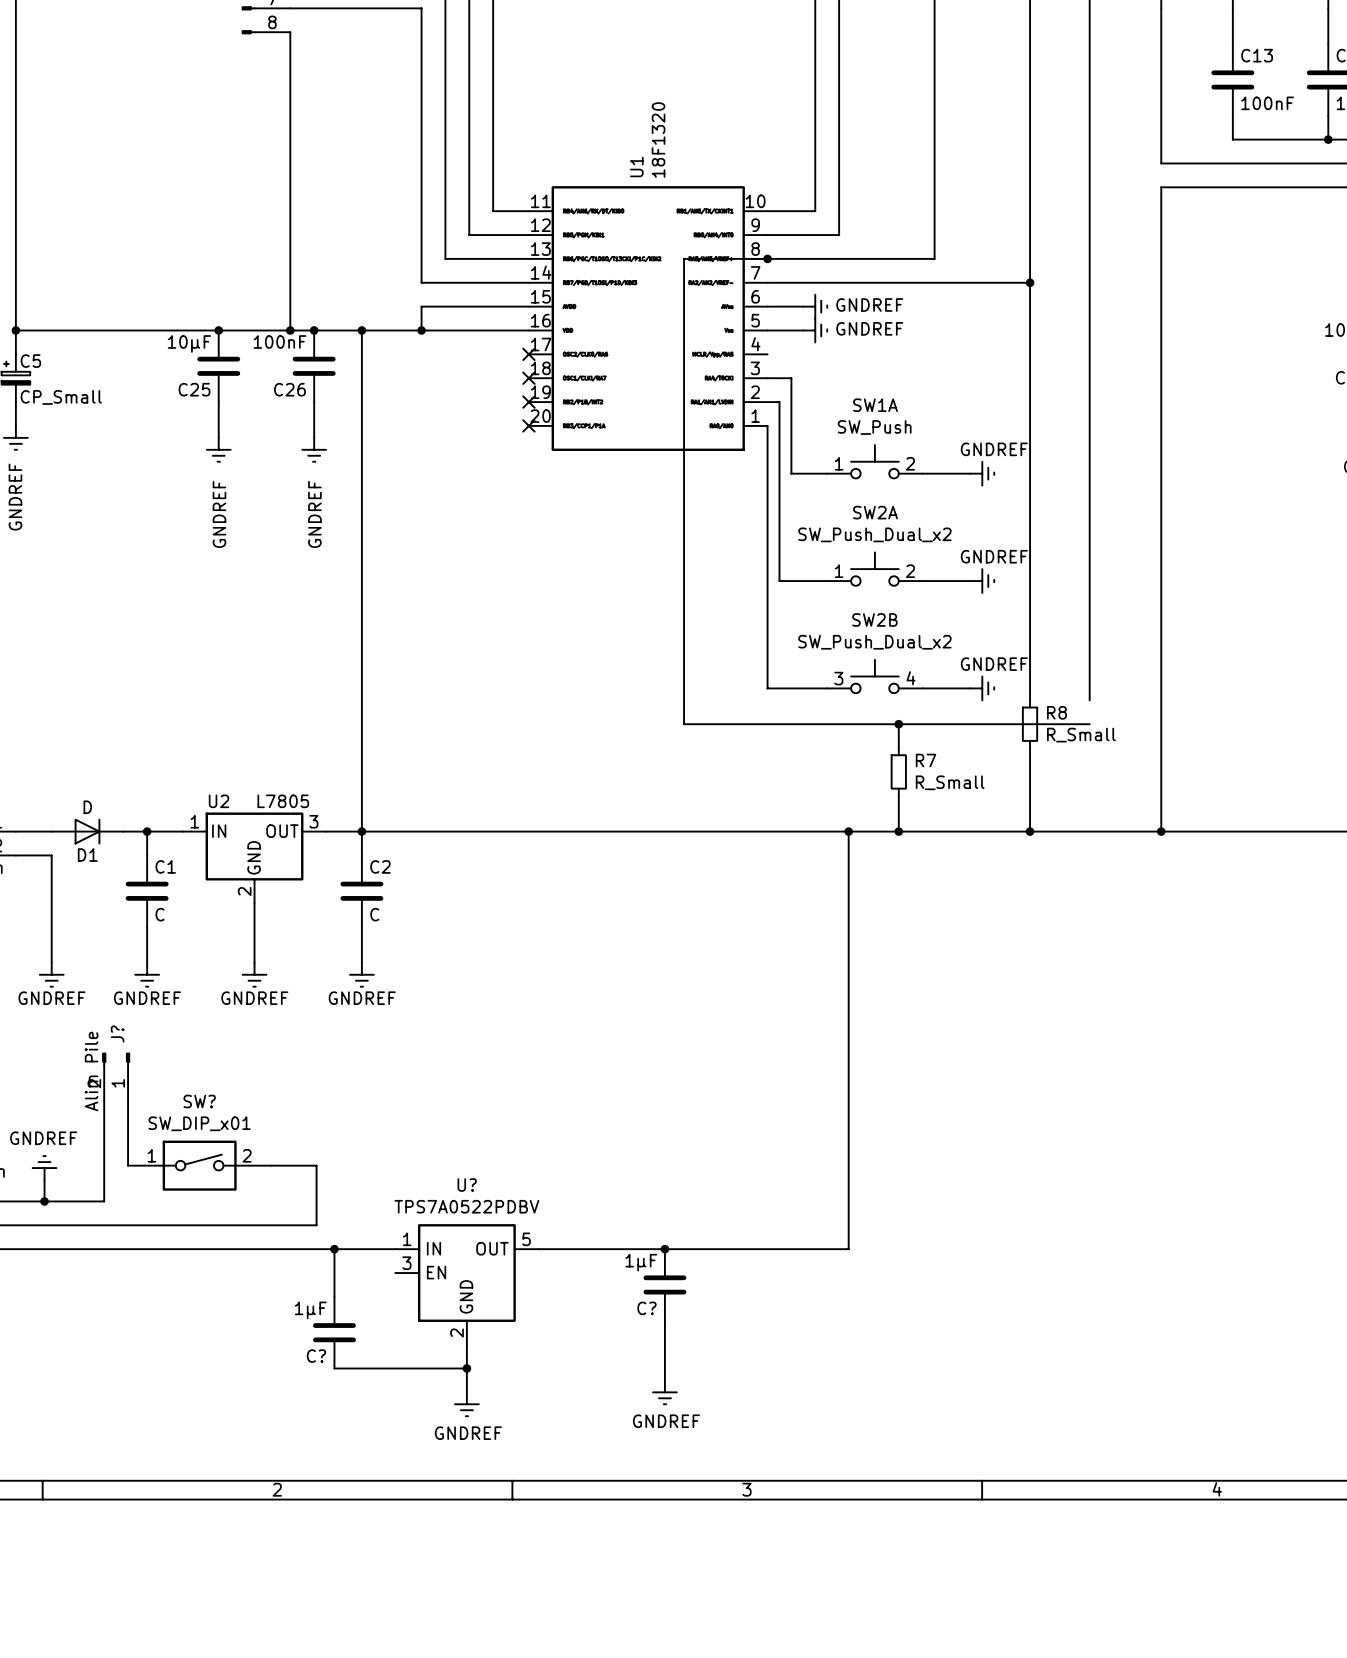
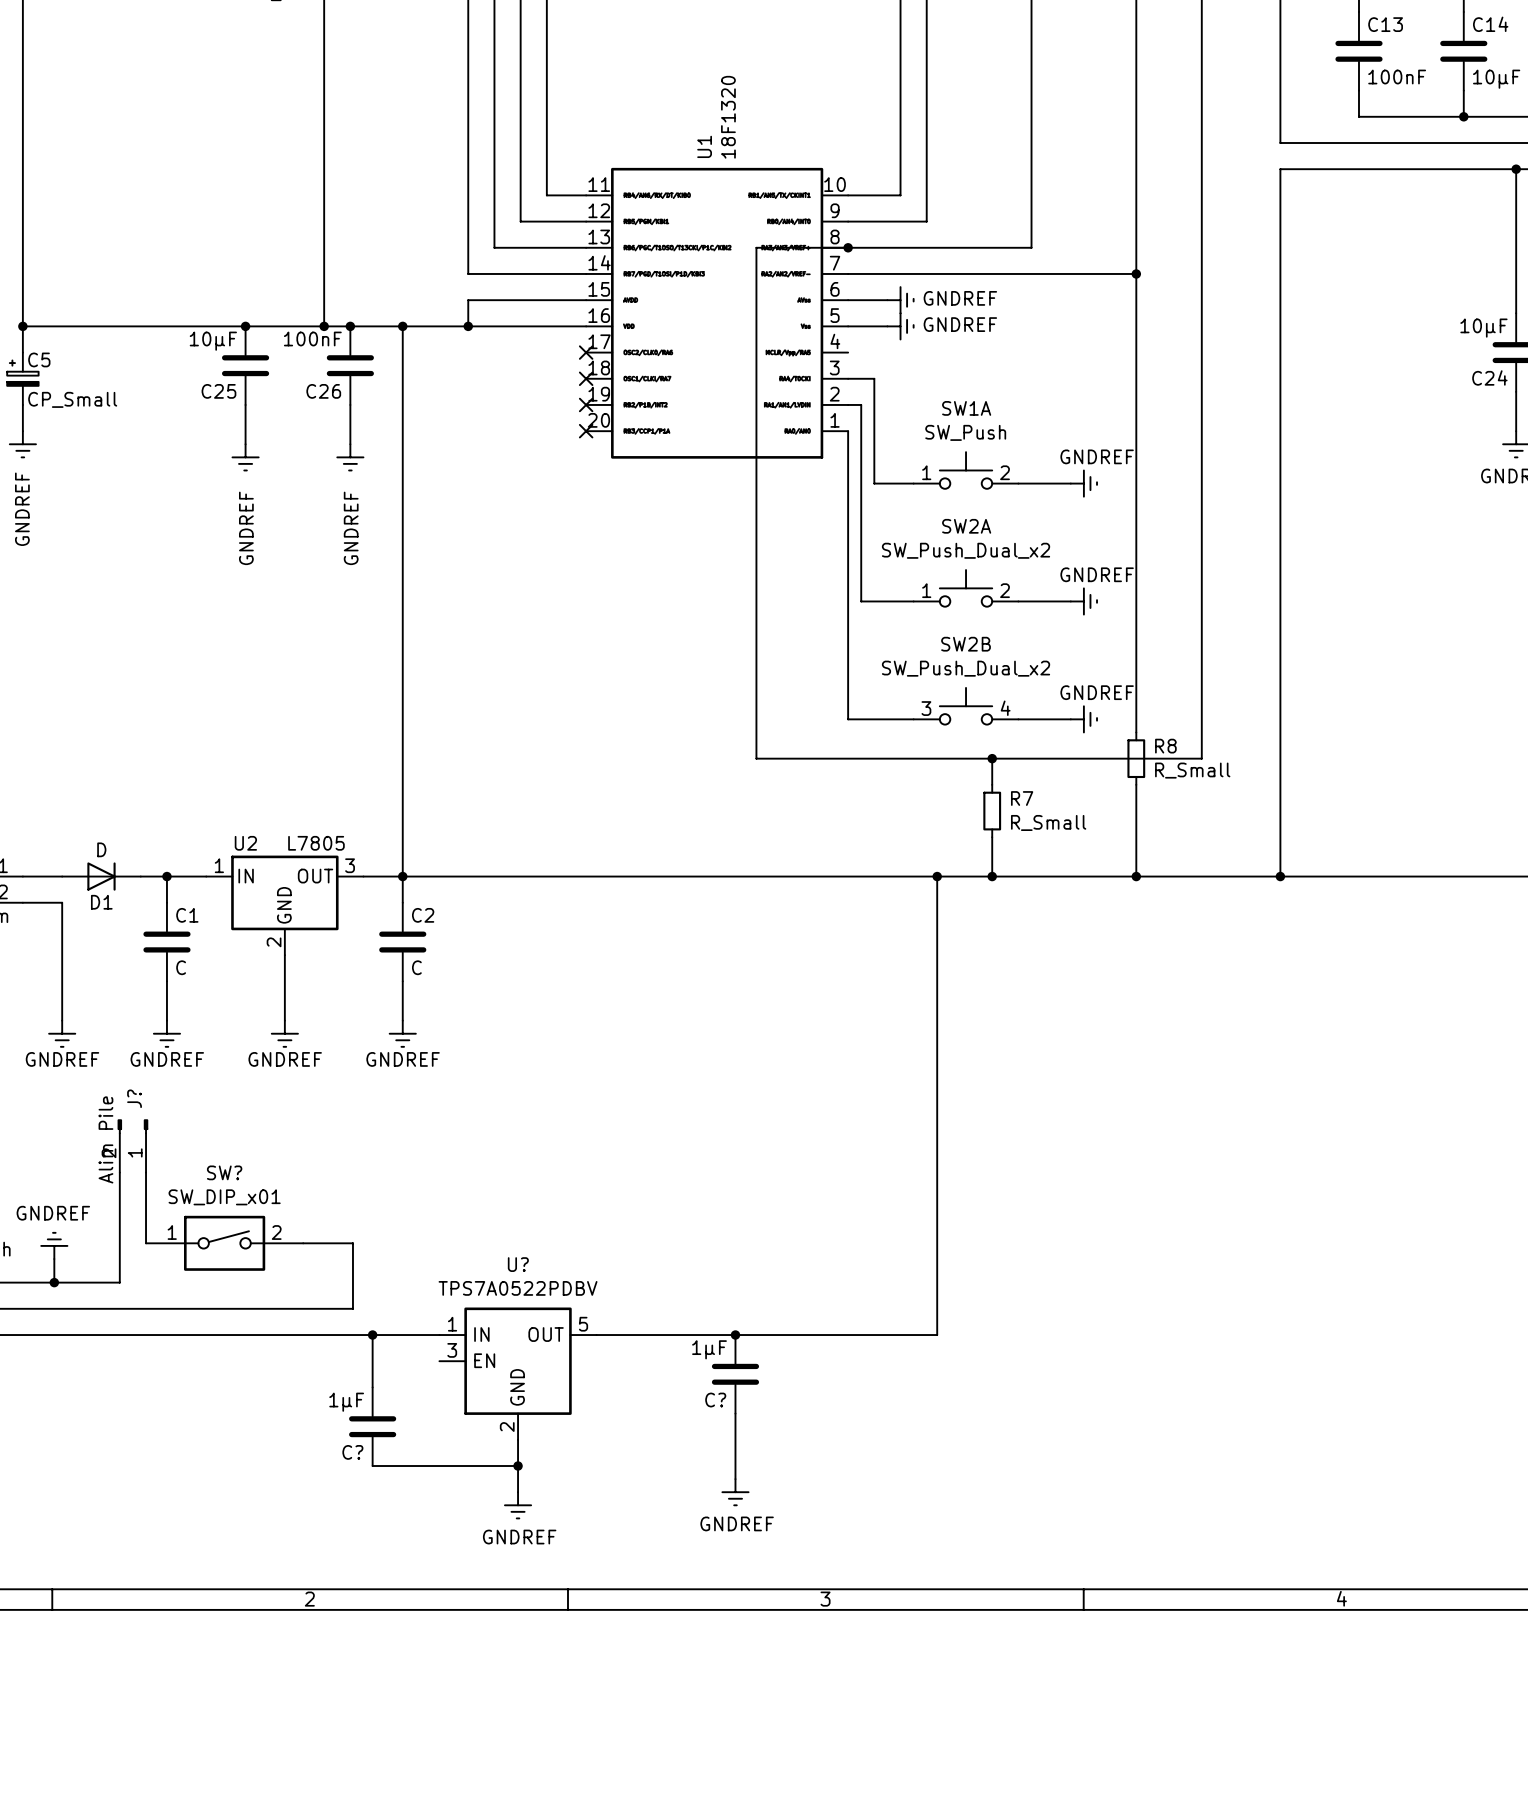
wire: none -> (1201, 732) (1201, 758)

